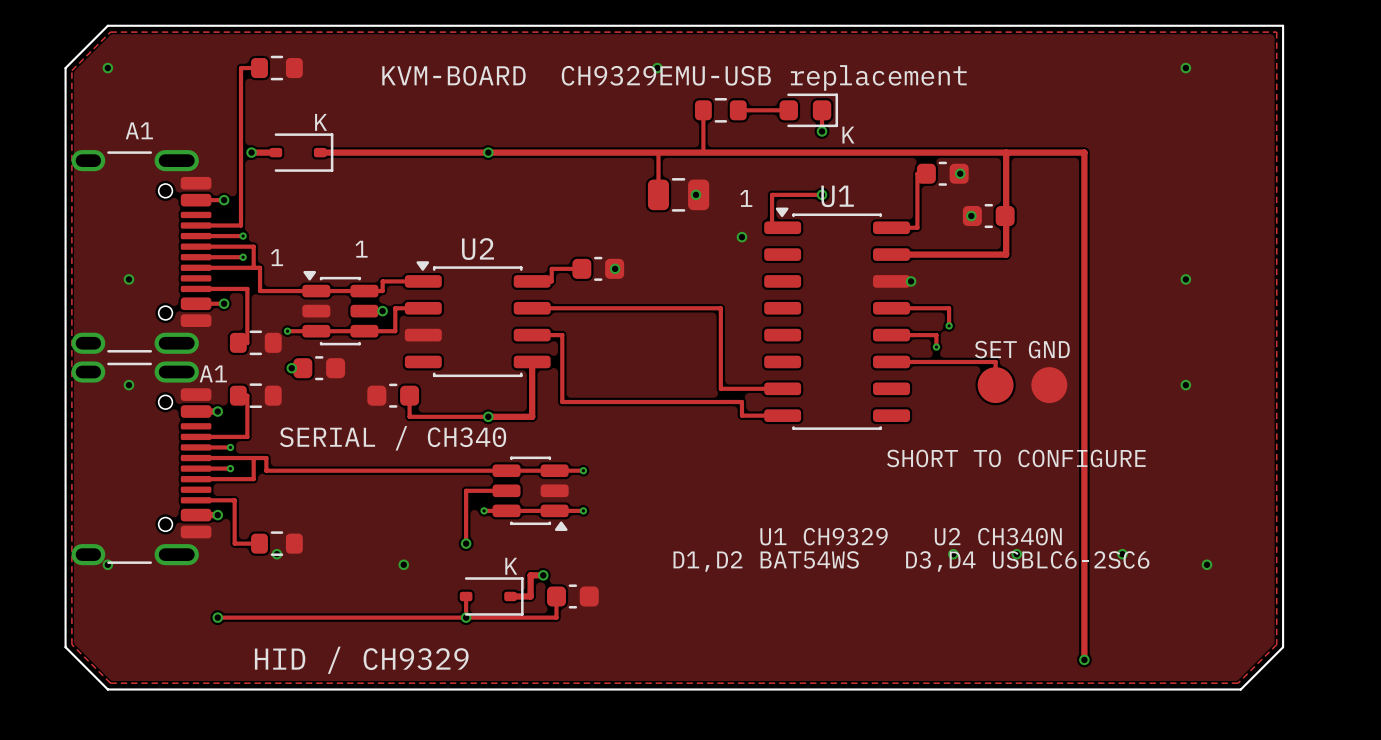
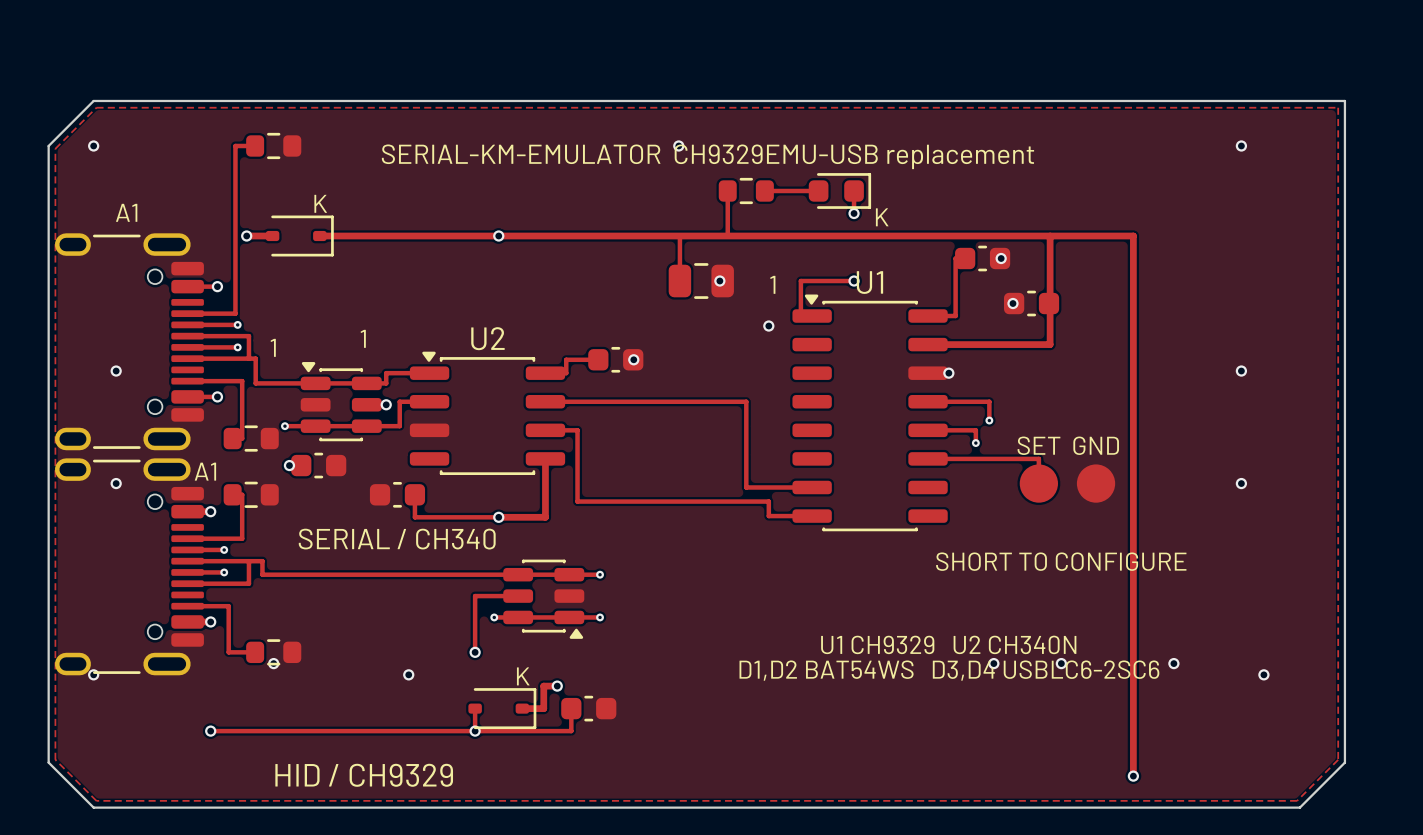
text: KVM-BOARD CH9329EMU-USB replacement (674, 77) -> SERIAL-KM-EMULATOR CH9329EMU-USB replacement (707, 156)

